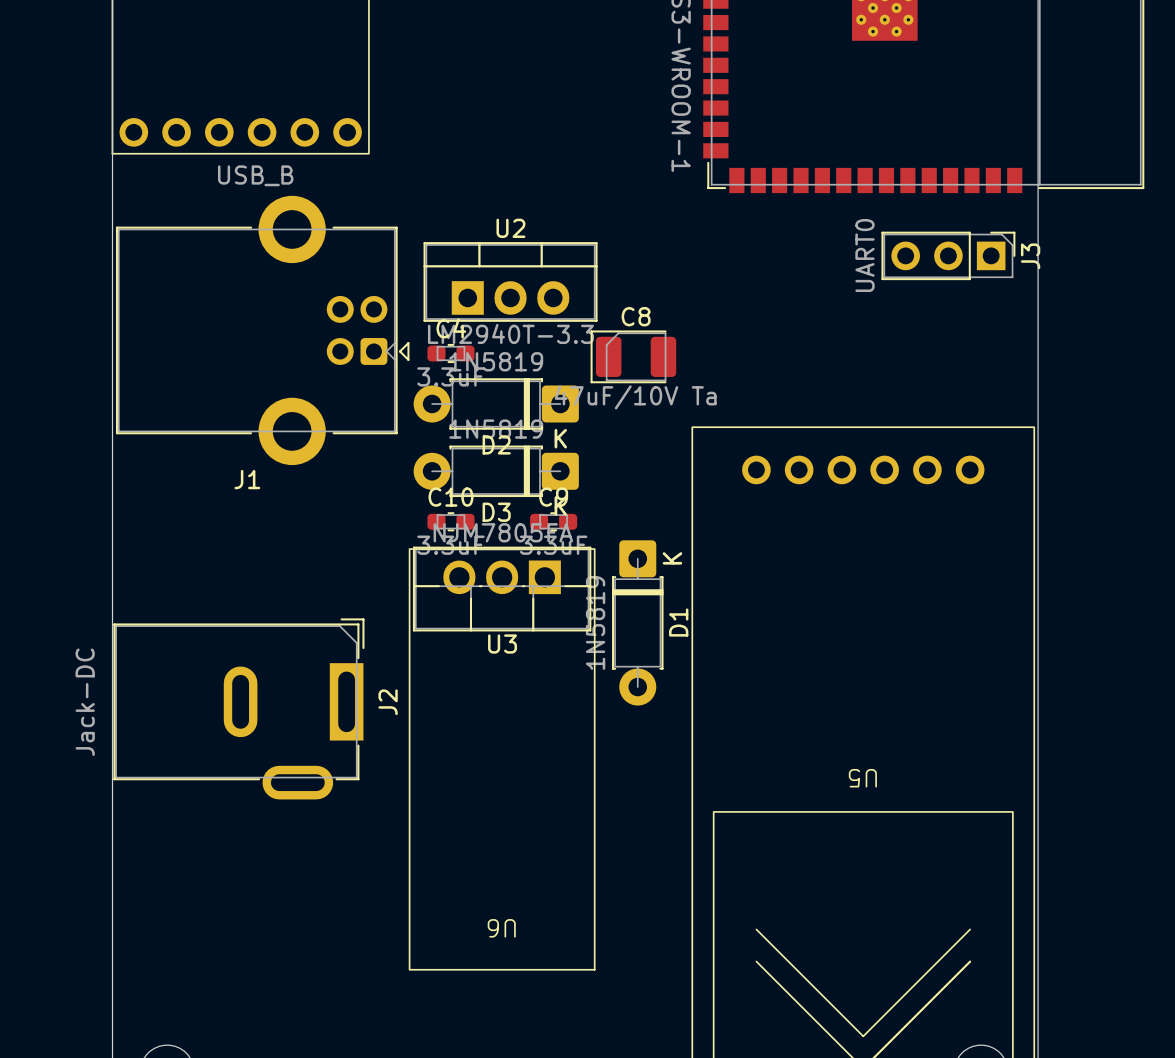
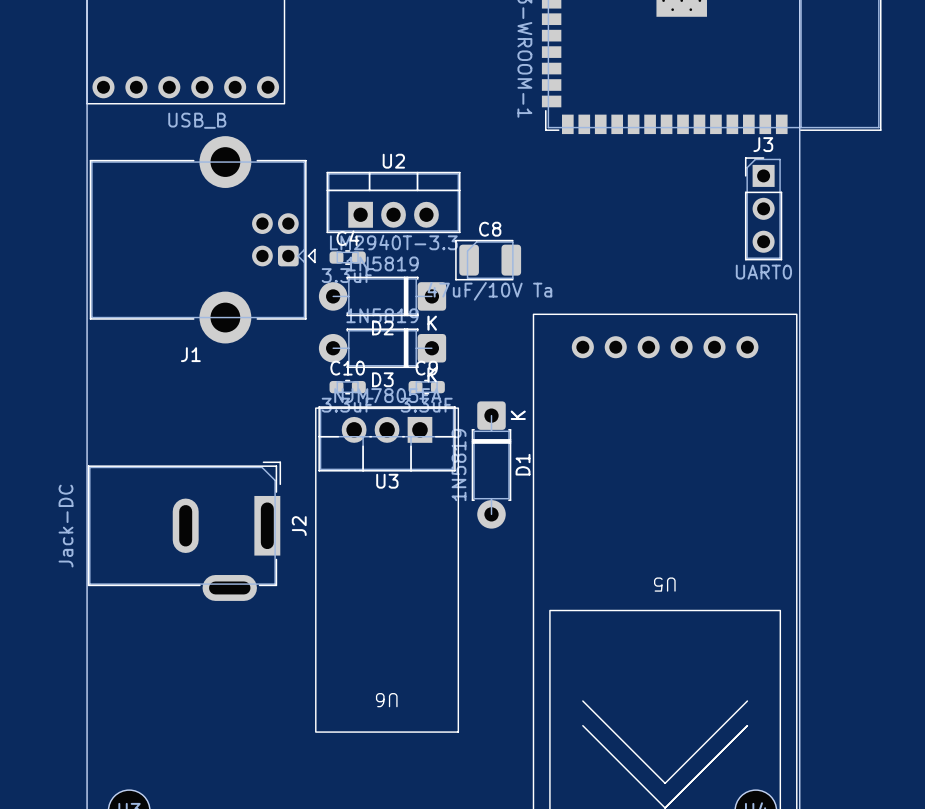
J3 rotation: 0° (948, 255) -> 90° counterclockwise (763, 208)

